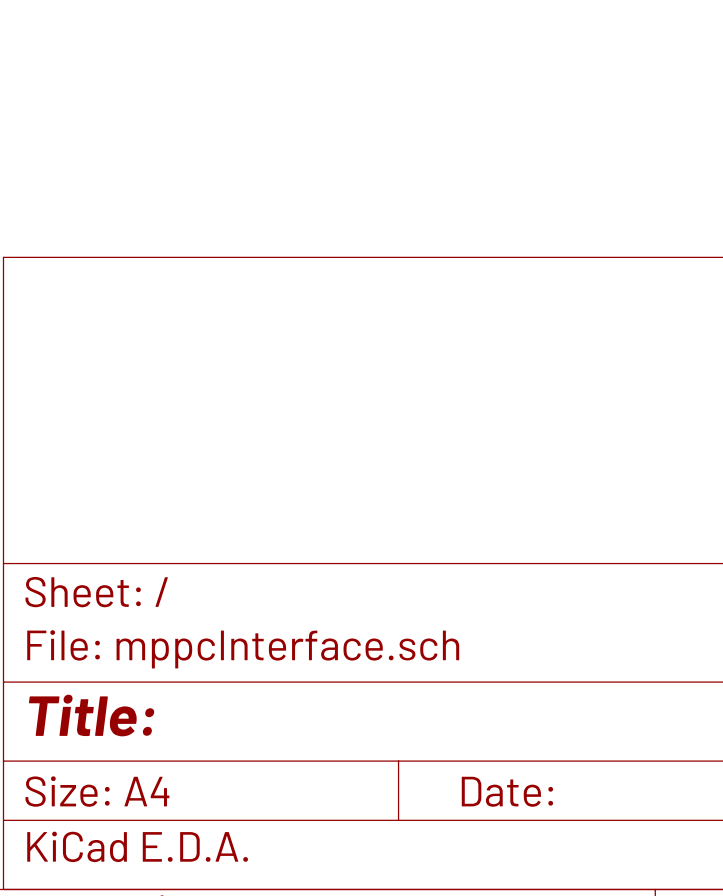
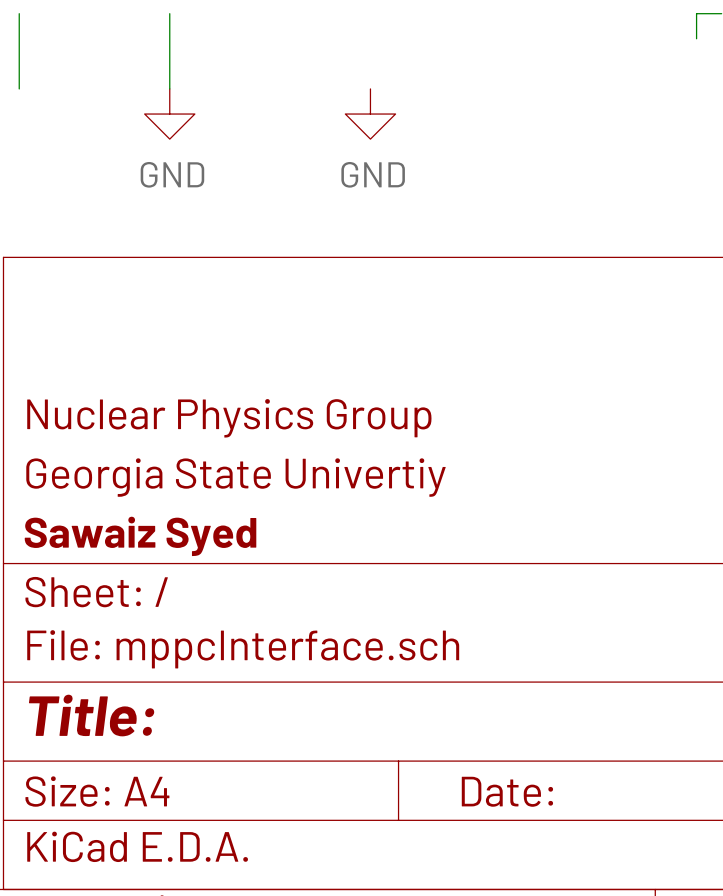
wire: none -> (19, 13) (19, 88)
wire: none -> (169, 13) (169, 88)
wire: none -> (721, 13) (696, 13) (696, 38)
power symbol: none -> GND (169, 114)
power symbol: none -> GND (370, 114)
title block: none -> Nuclear Physics Group (229, 418)
title block: none -> Georgia State Univertiy (236, 477)
title block: none -> Sawaiz Syed (140, 536)

